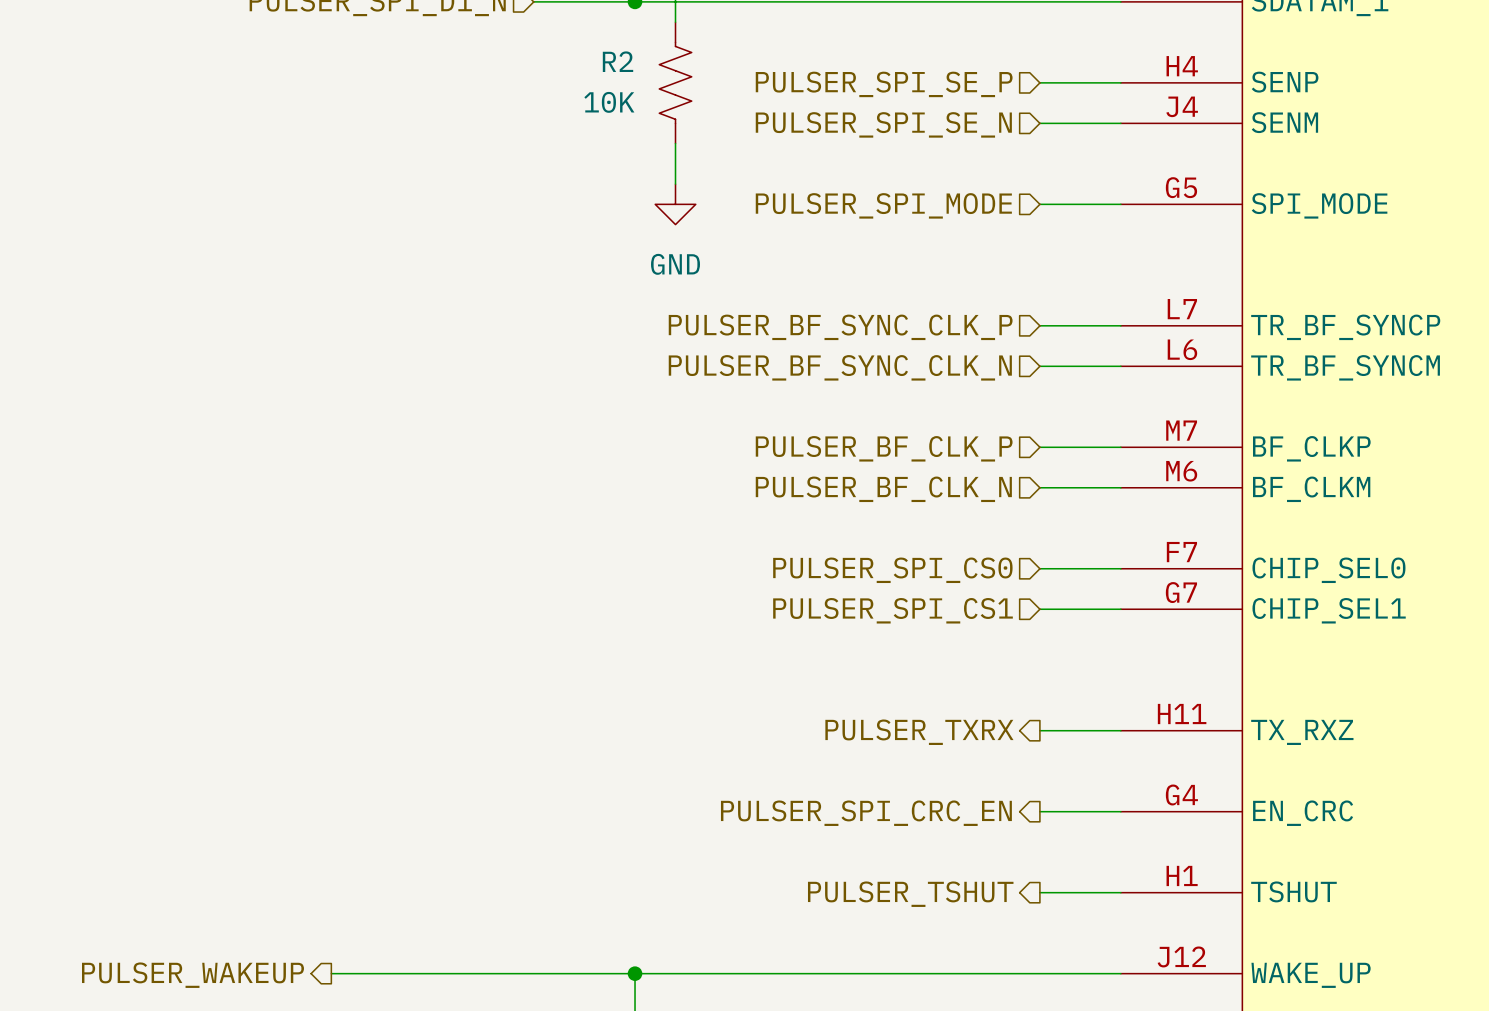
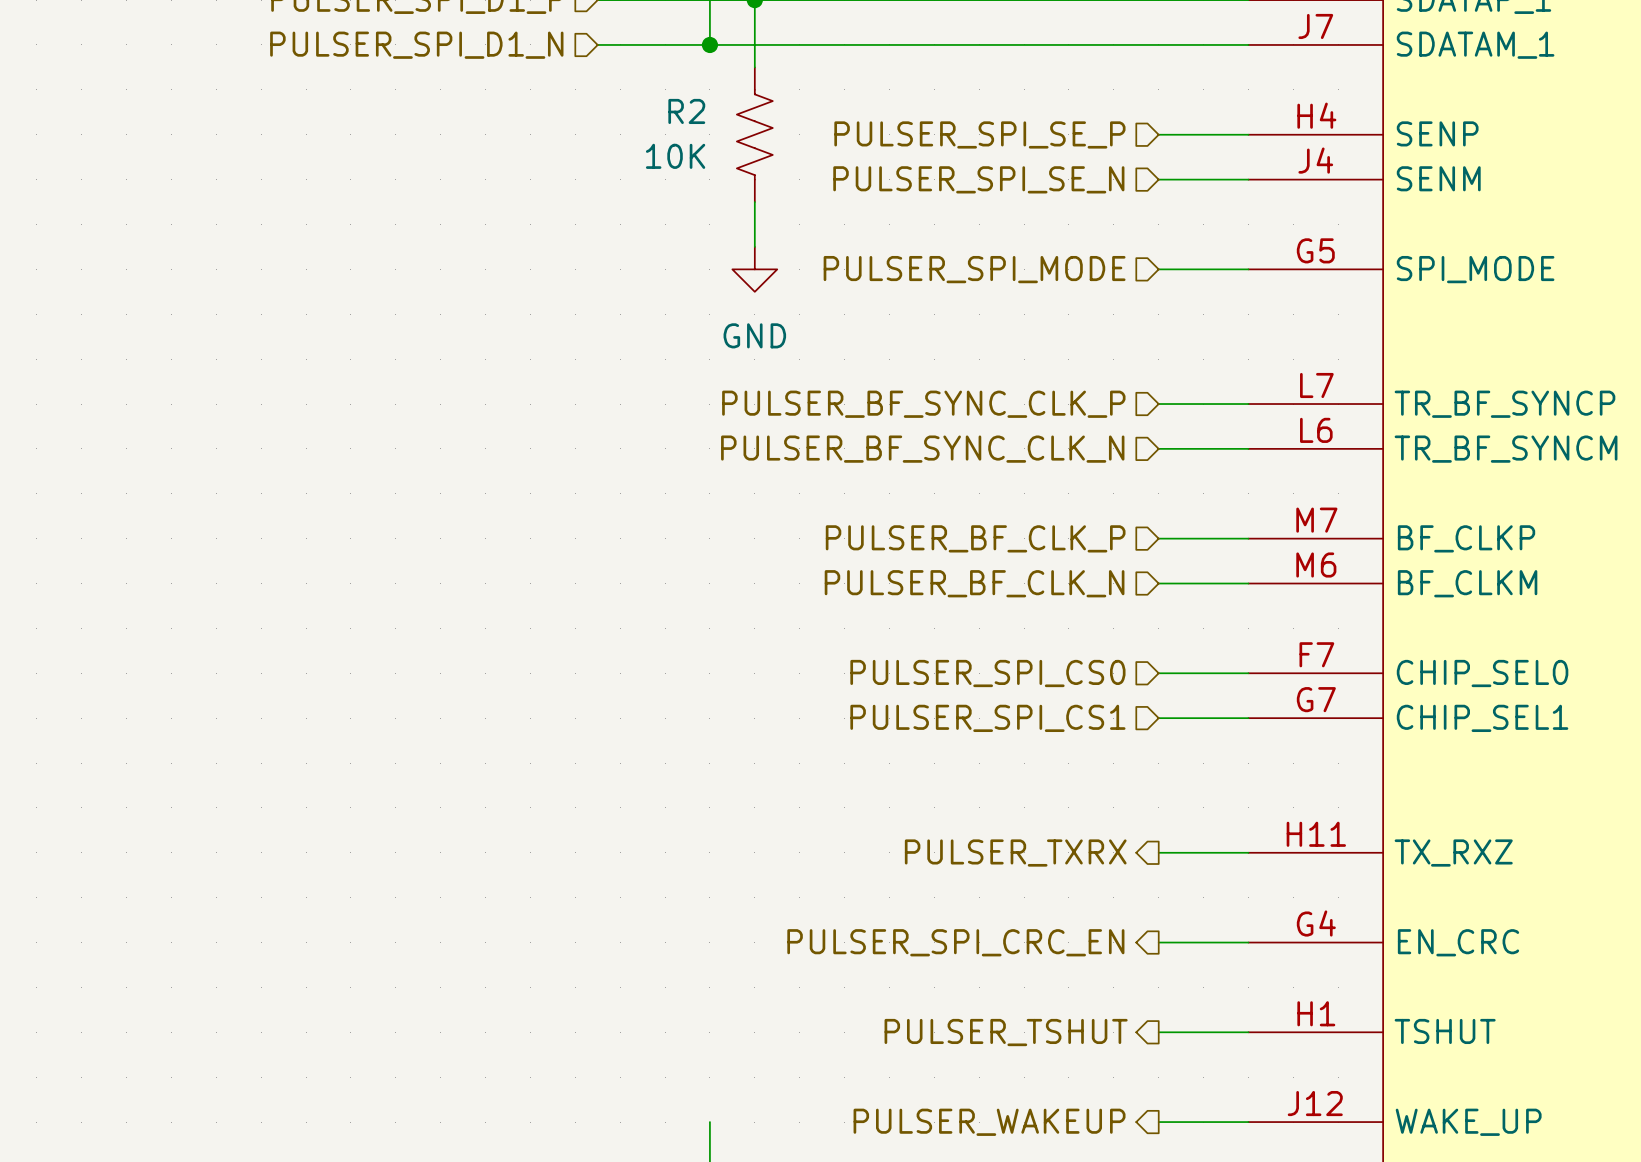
wire: (331, 973) (1039, 973) -> none
junction: (635, 973) -> none
hierarchical label: PULSER_WAKEUP (192, 975) -> none
hierarchical label: none -> PULSER_WAKEUP (989, 1122)

